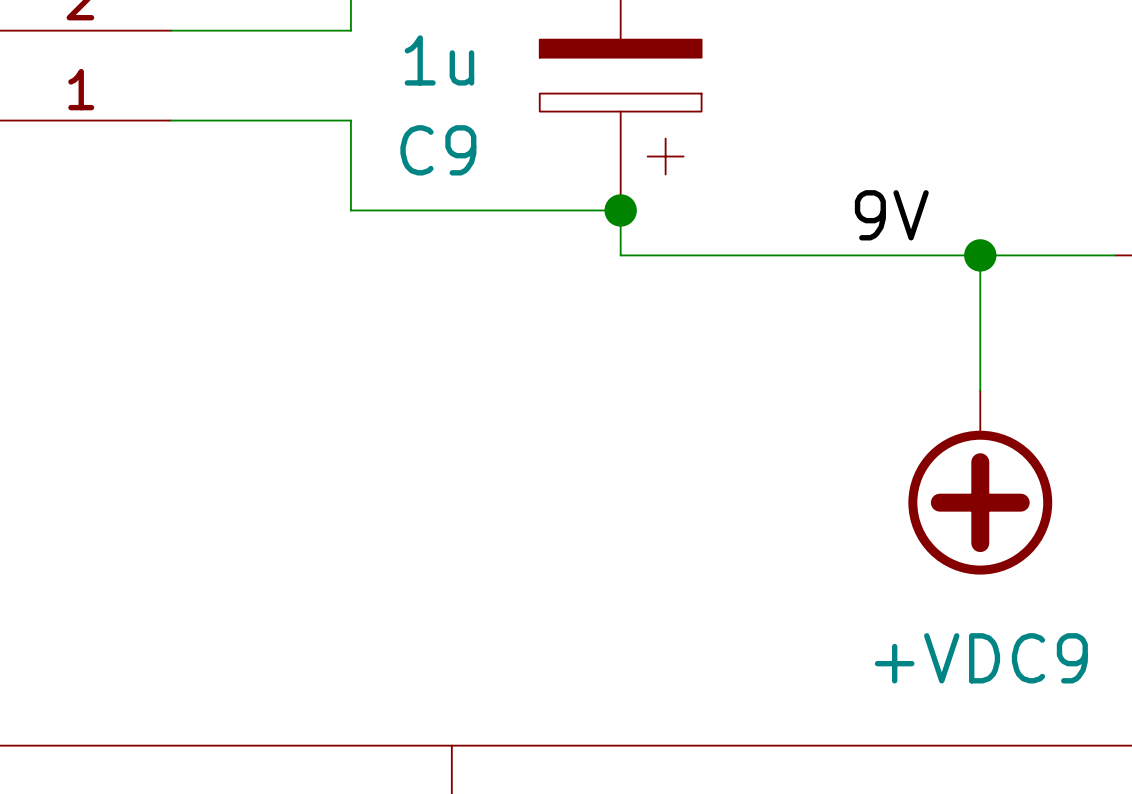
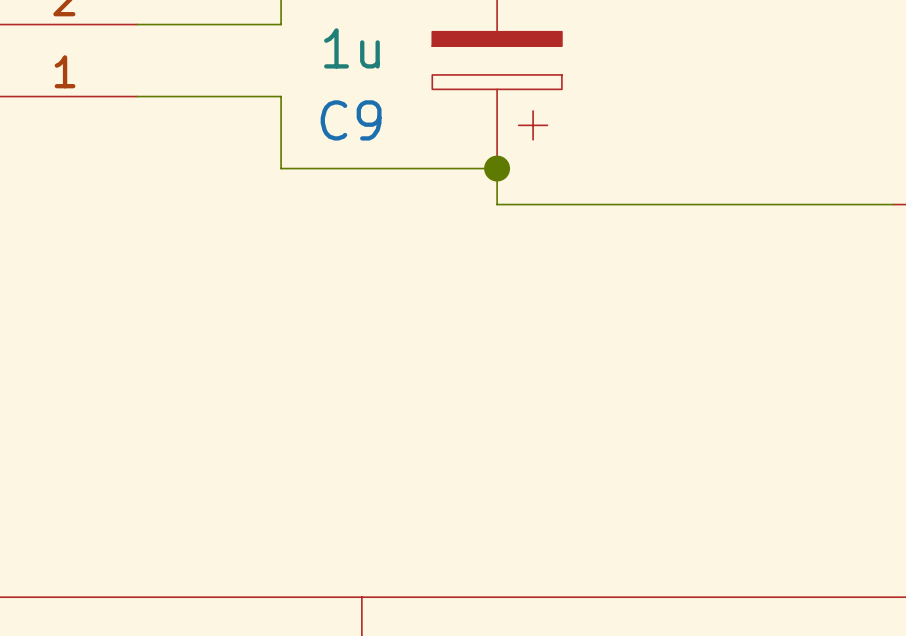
label: 9V (891, 215) -> none
wire: (980, 255) (980, 390) -> none
junction: (980, 255) -> none
power symbol: +VDC9 (980, 482) -> none

